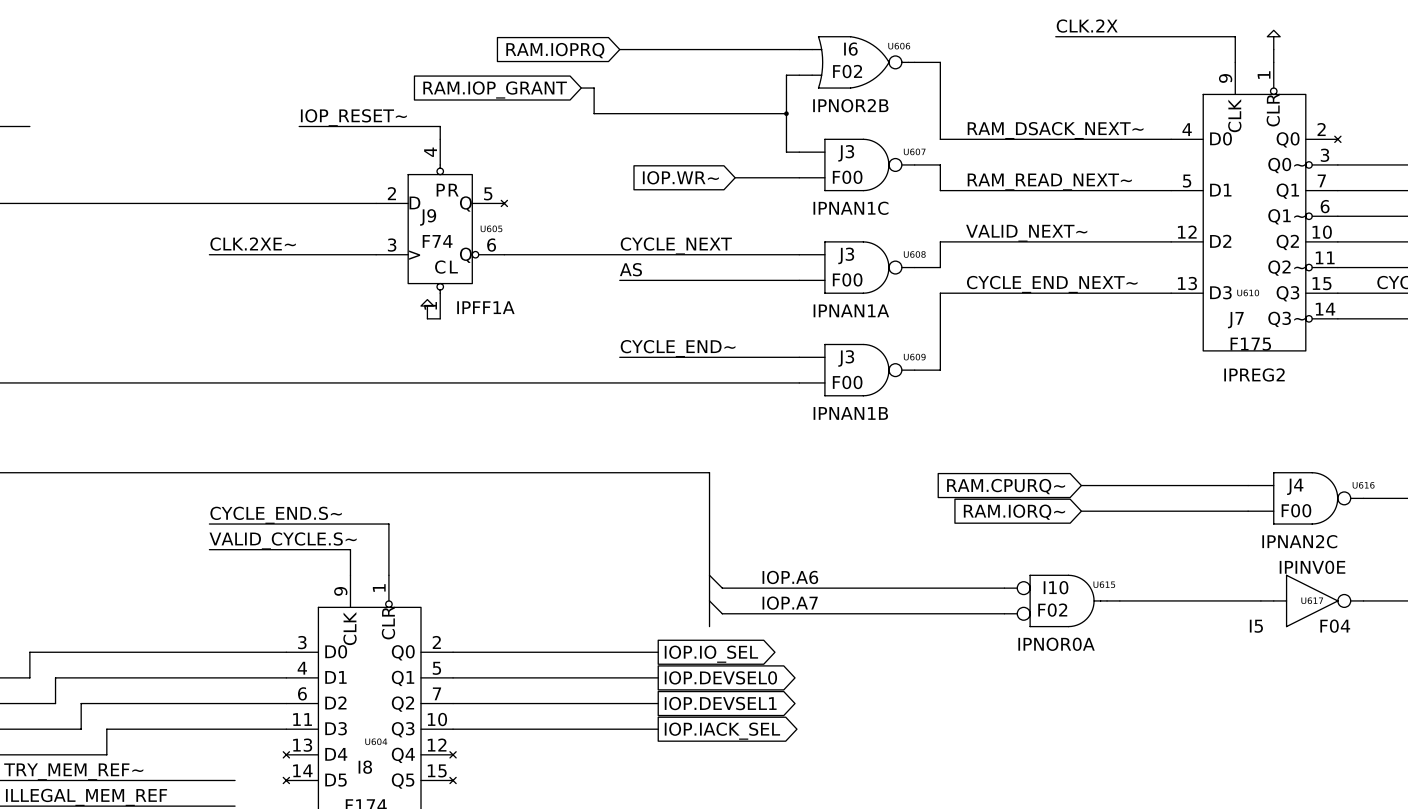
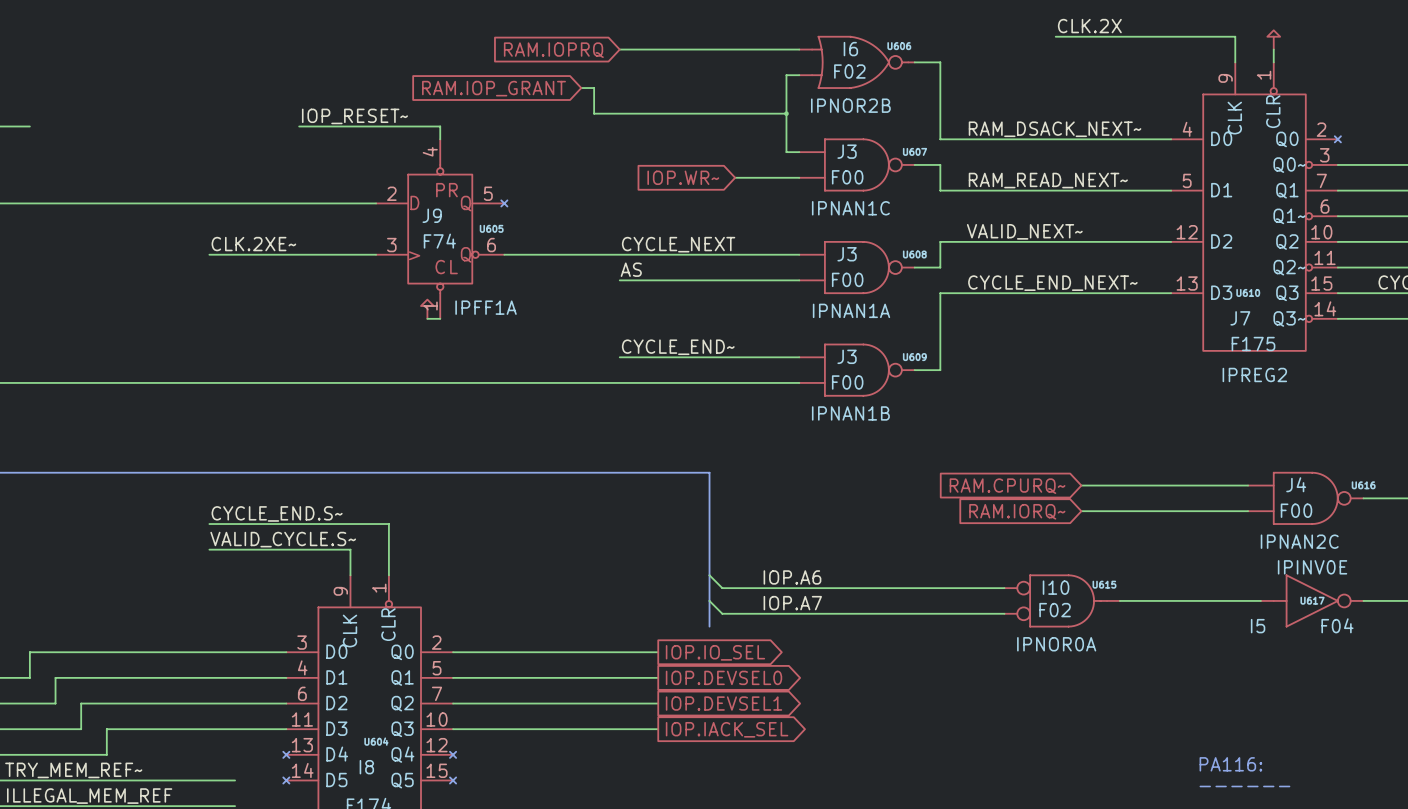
text: none -> PA116: (1230, 764)
text: none -> ------ (1244, 786)

